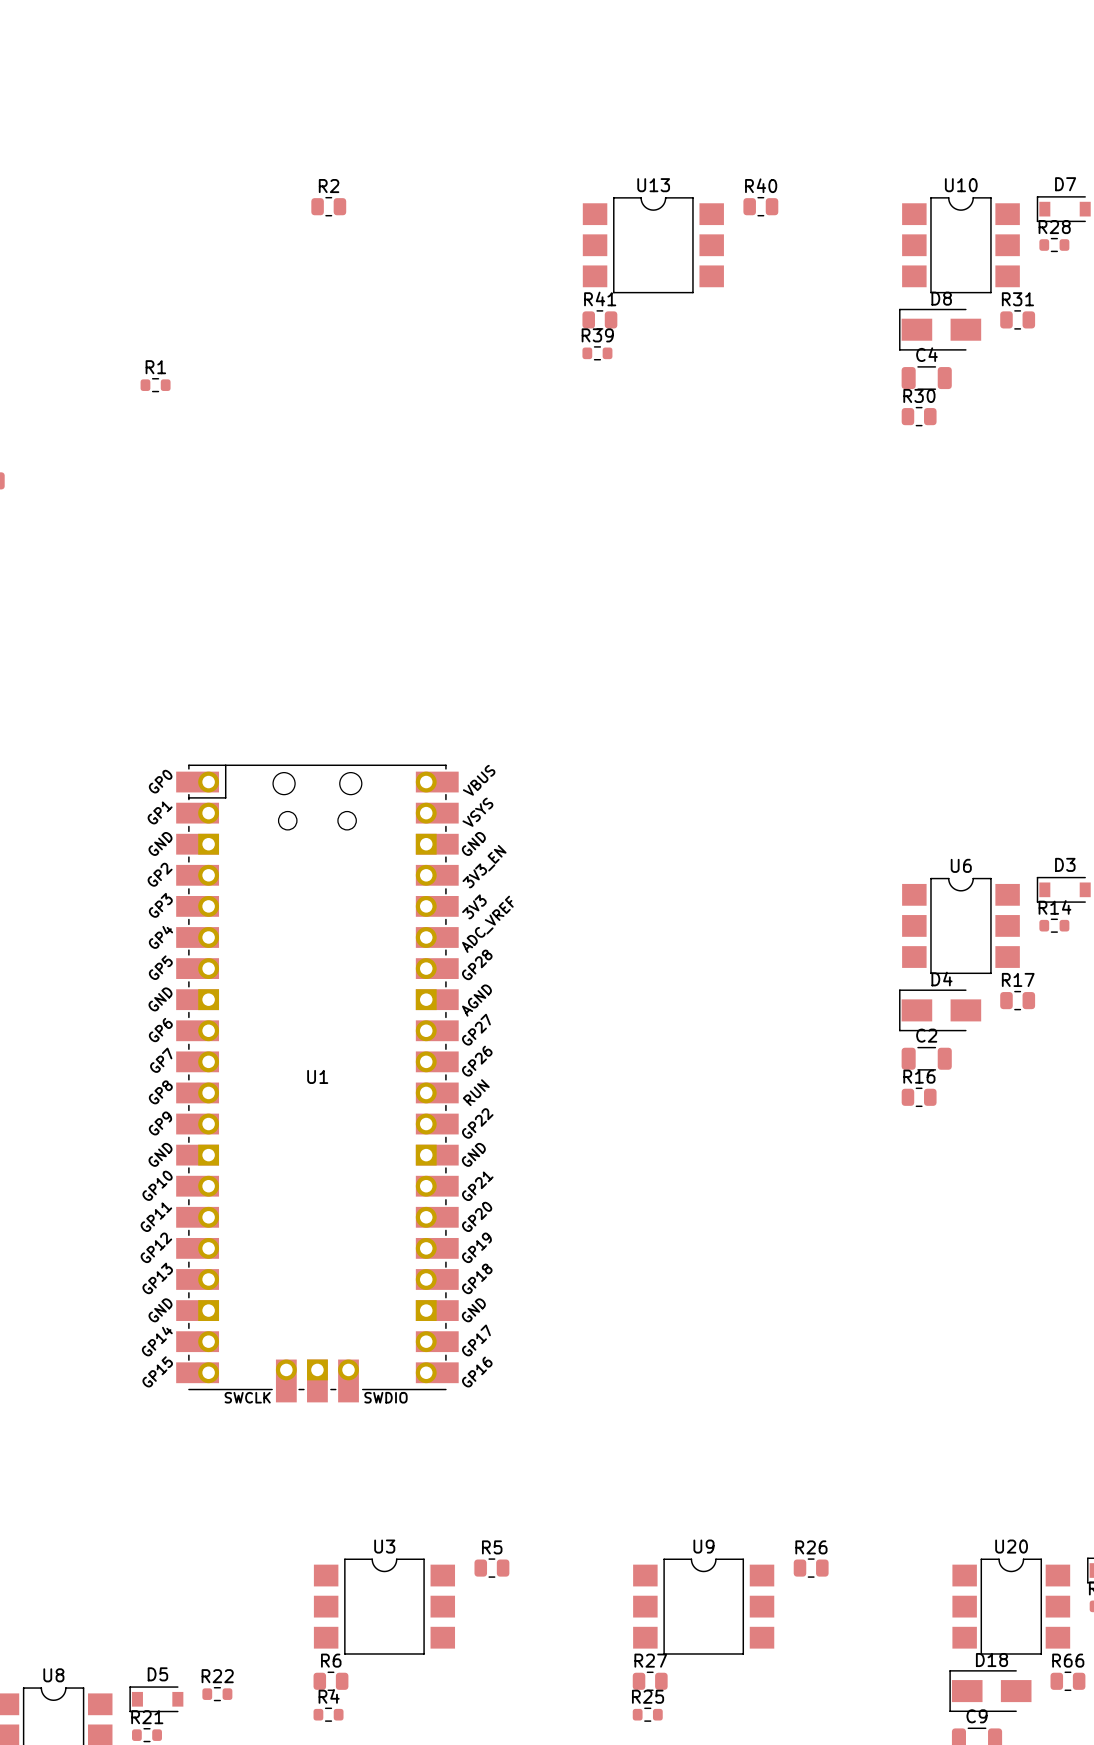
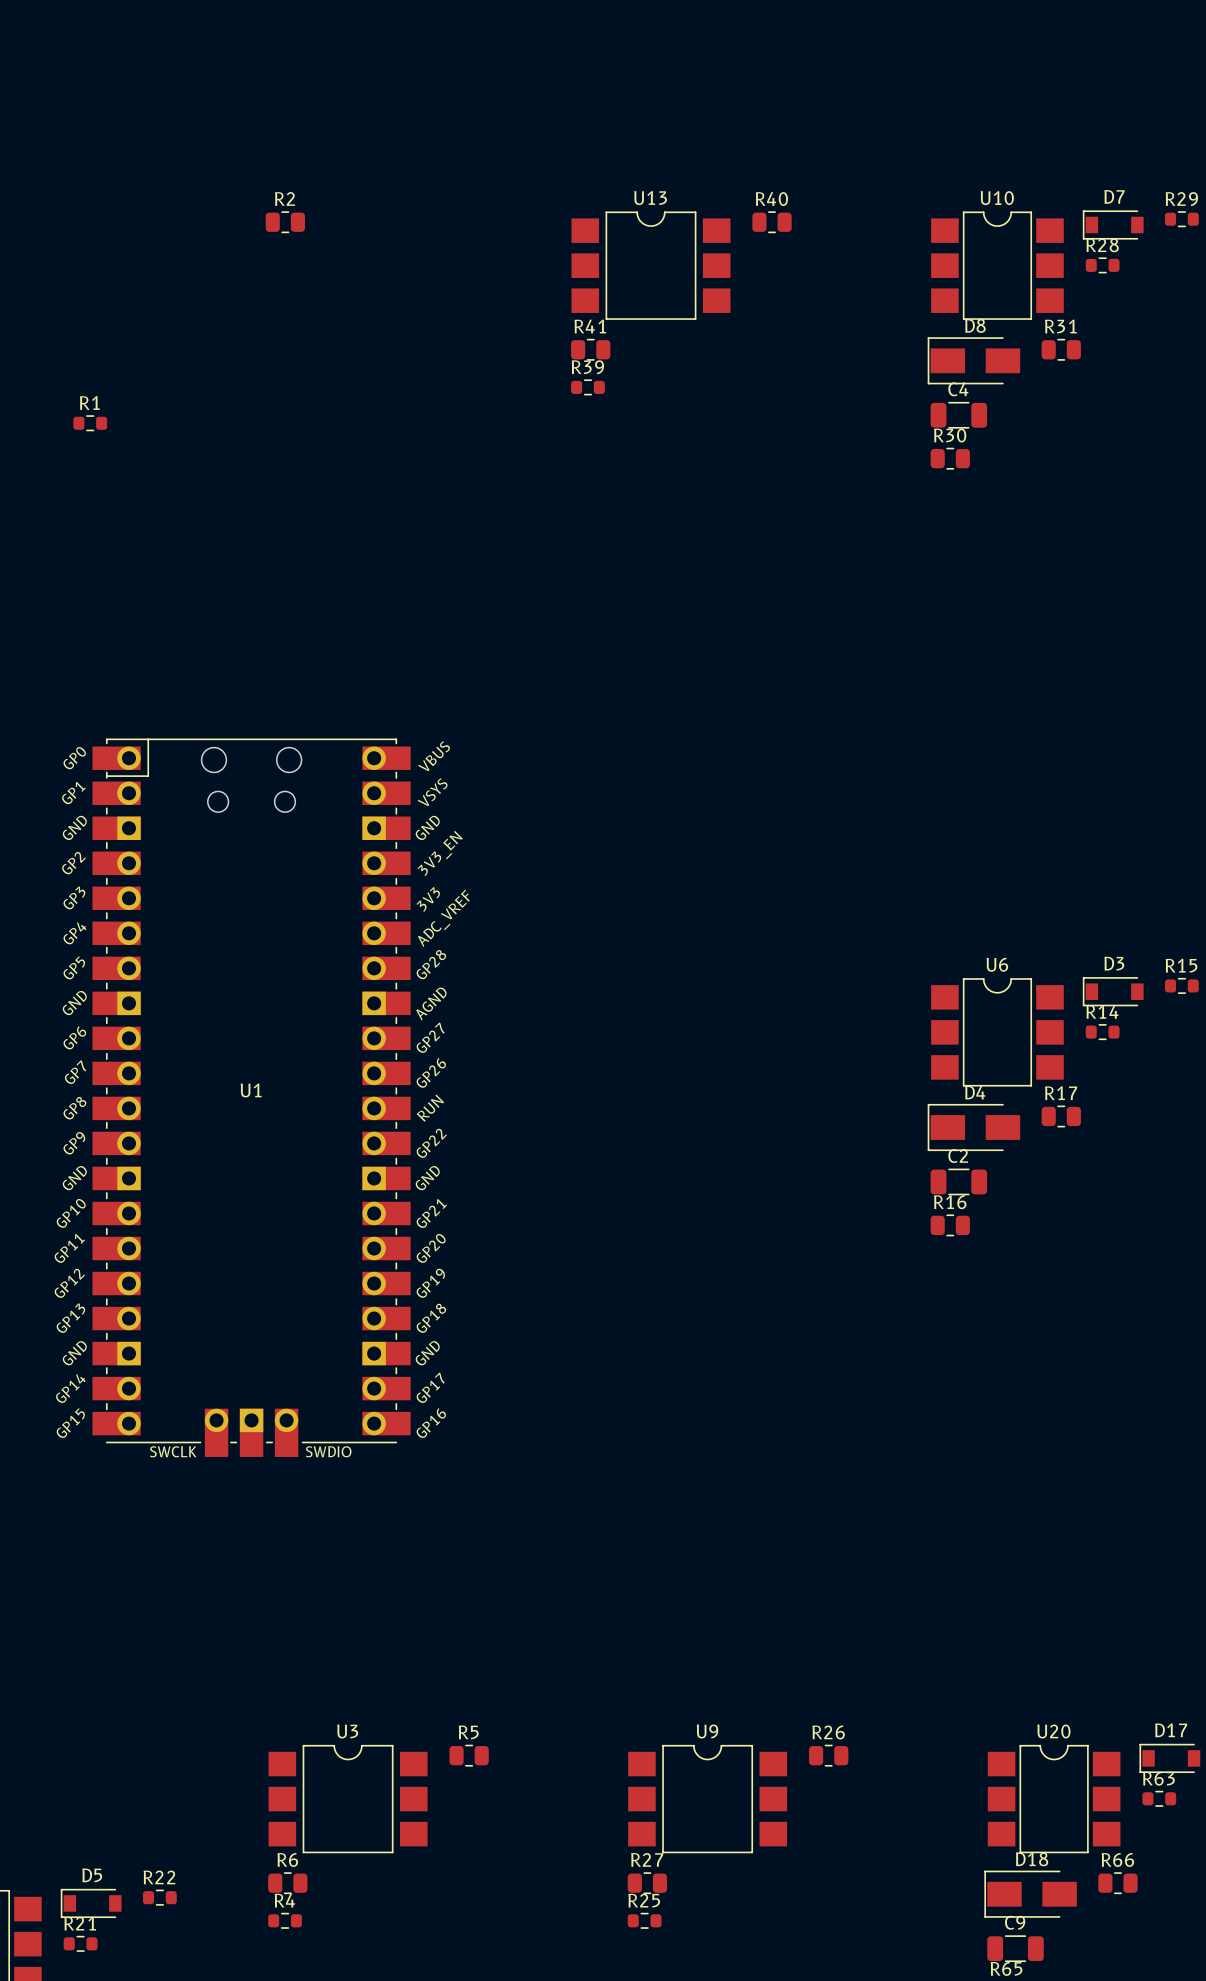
U1 position: (317, 1083) -> (251, 1097)

